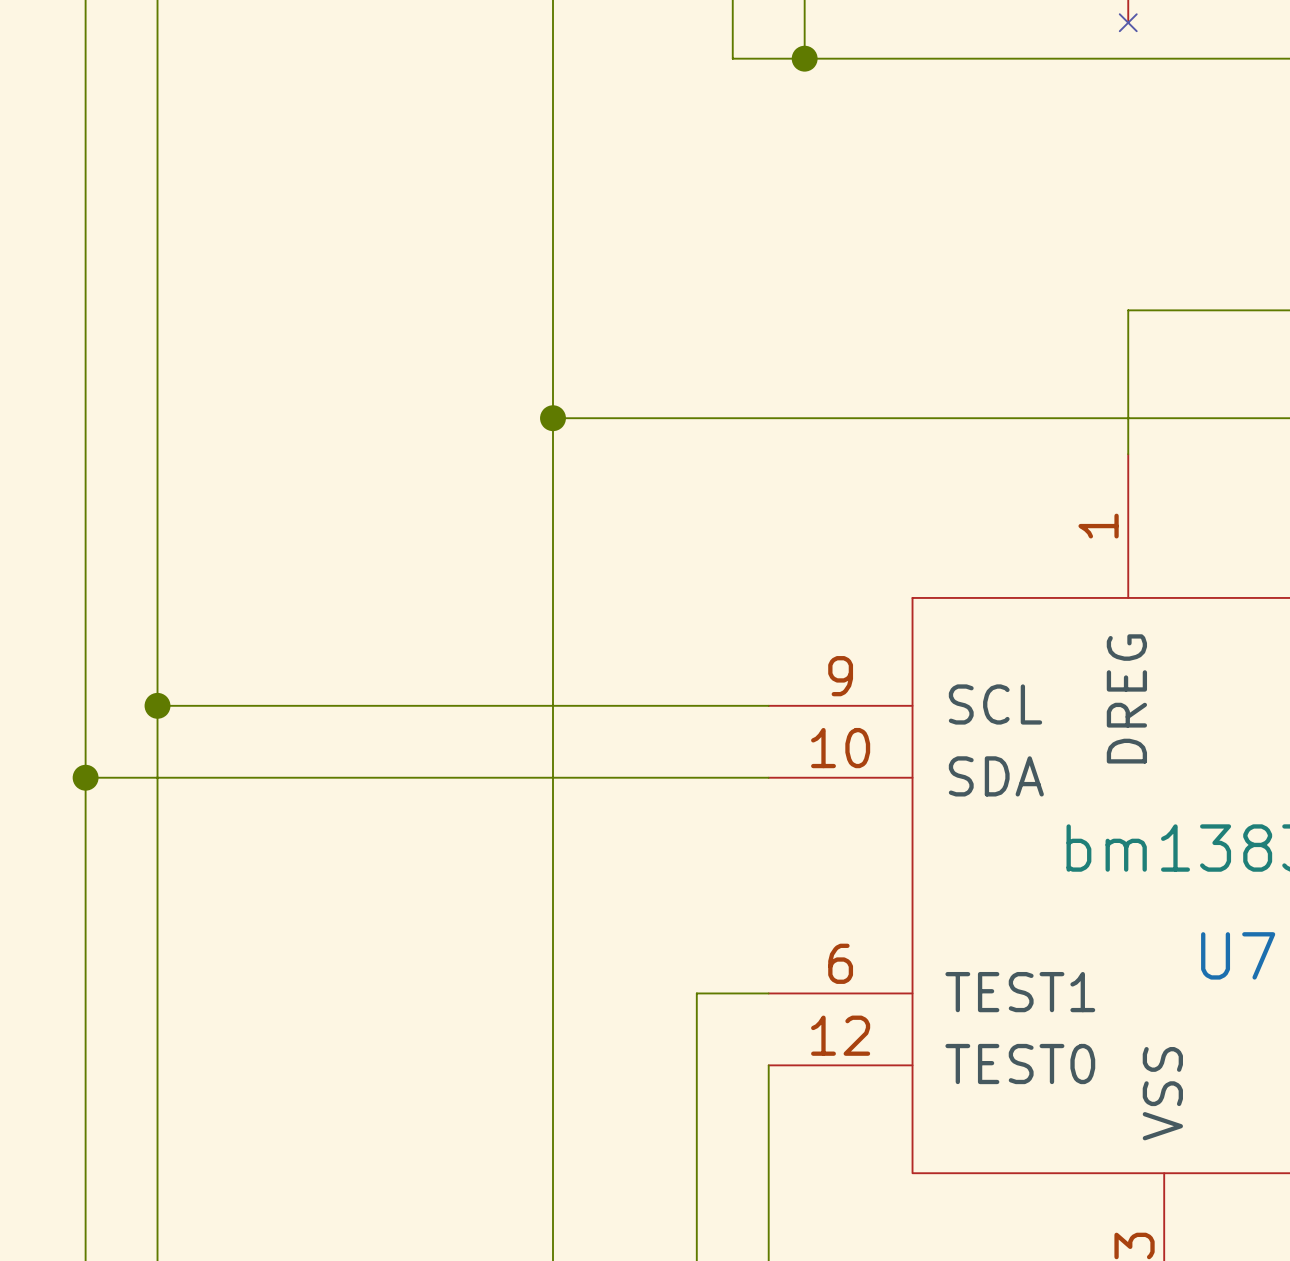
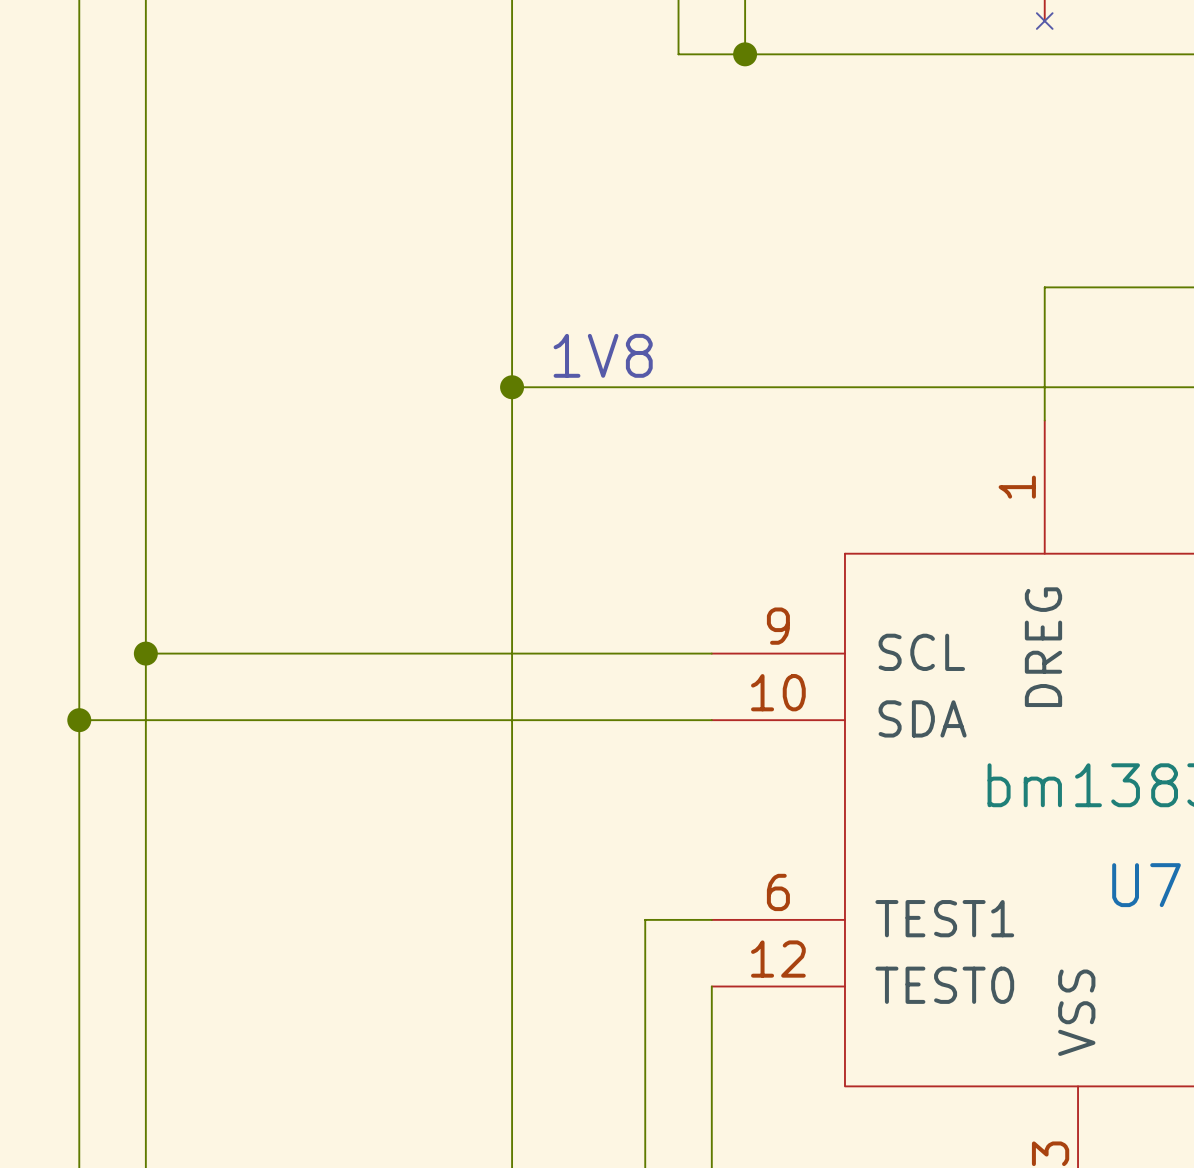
text: none -> 1V8 (603, 355)

